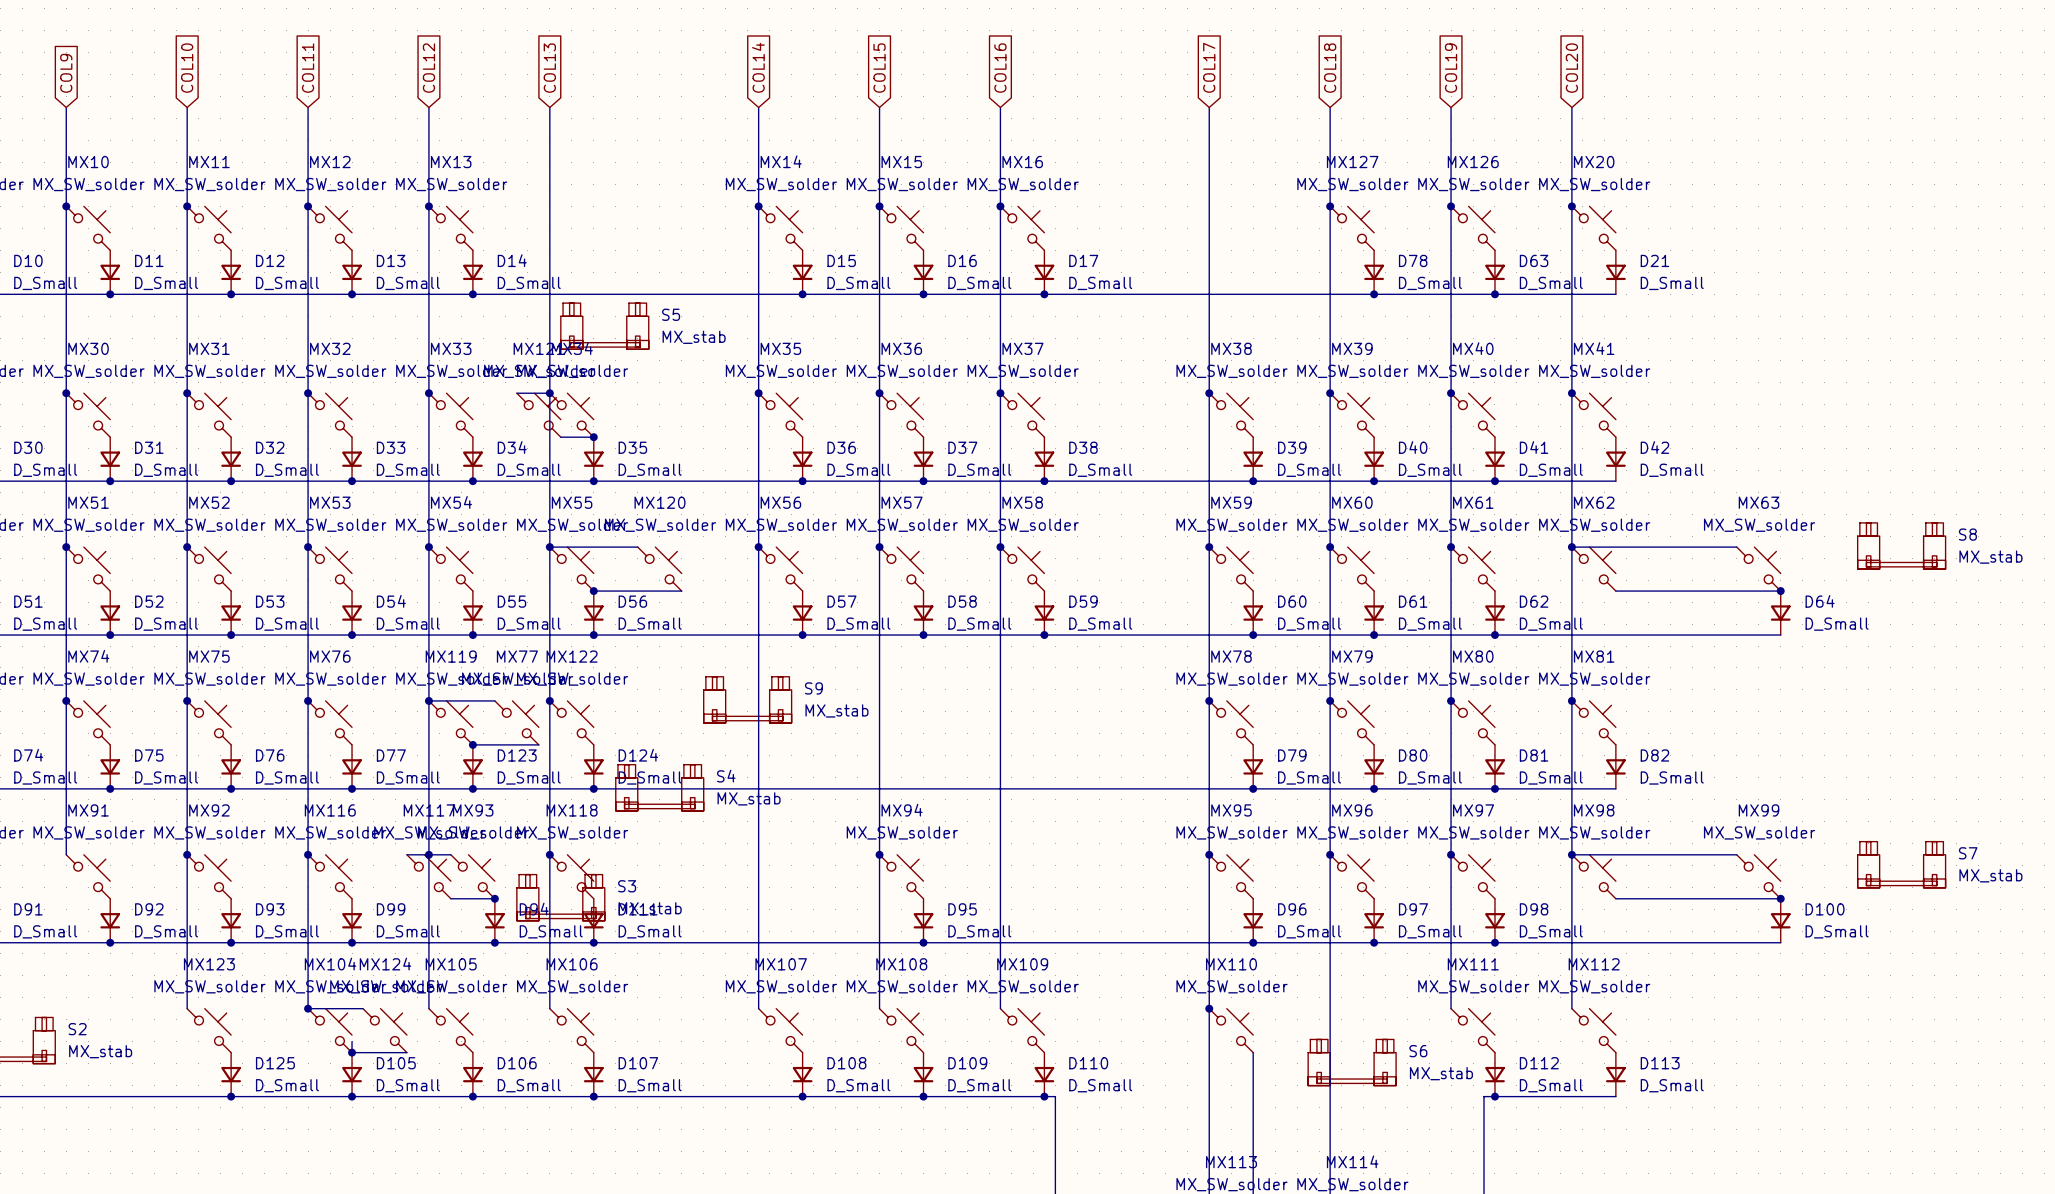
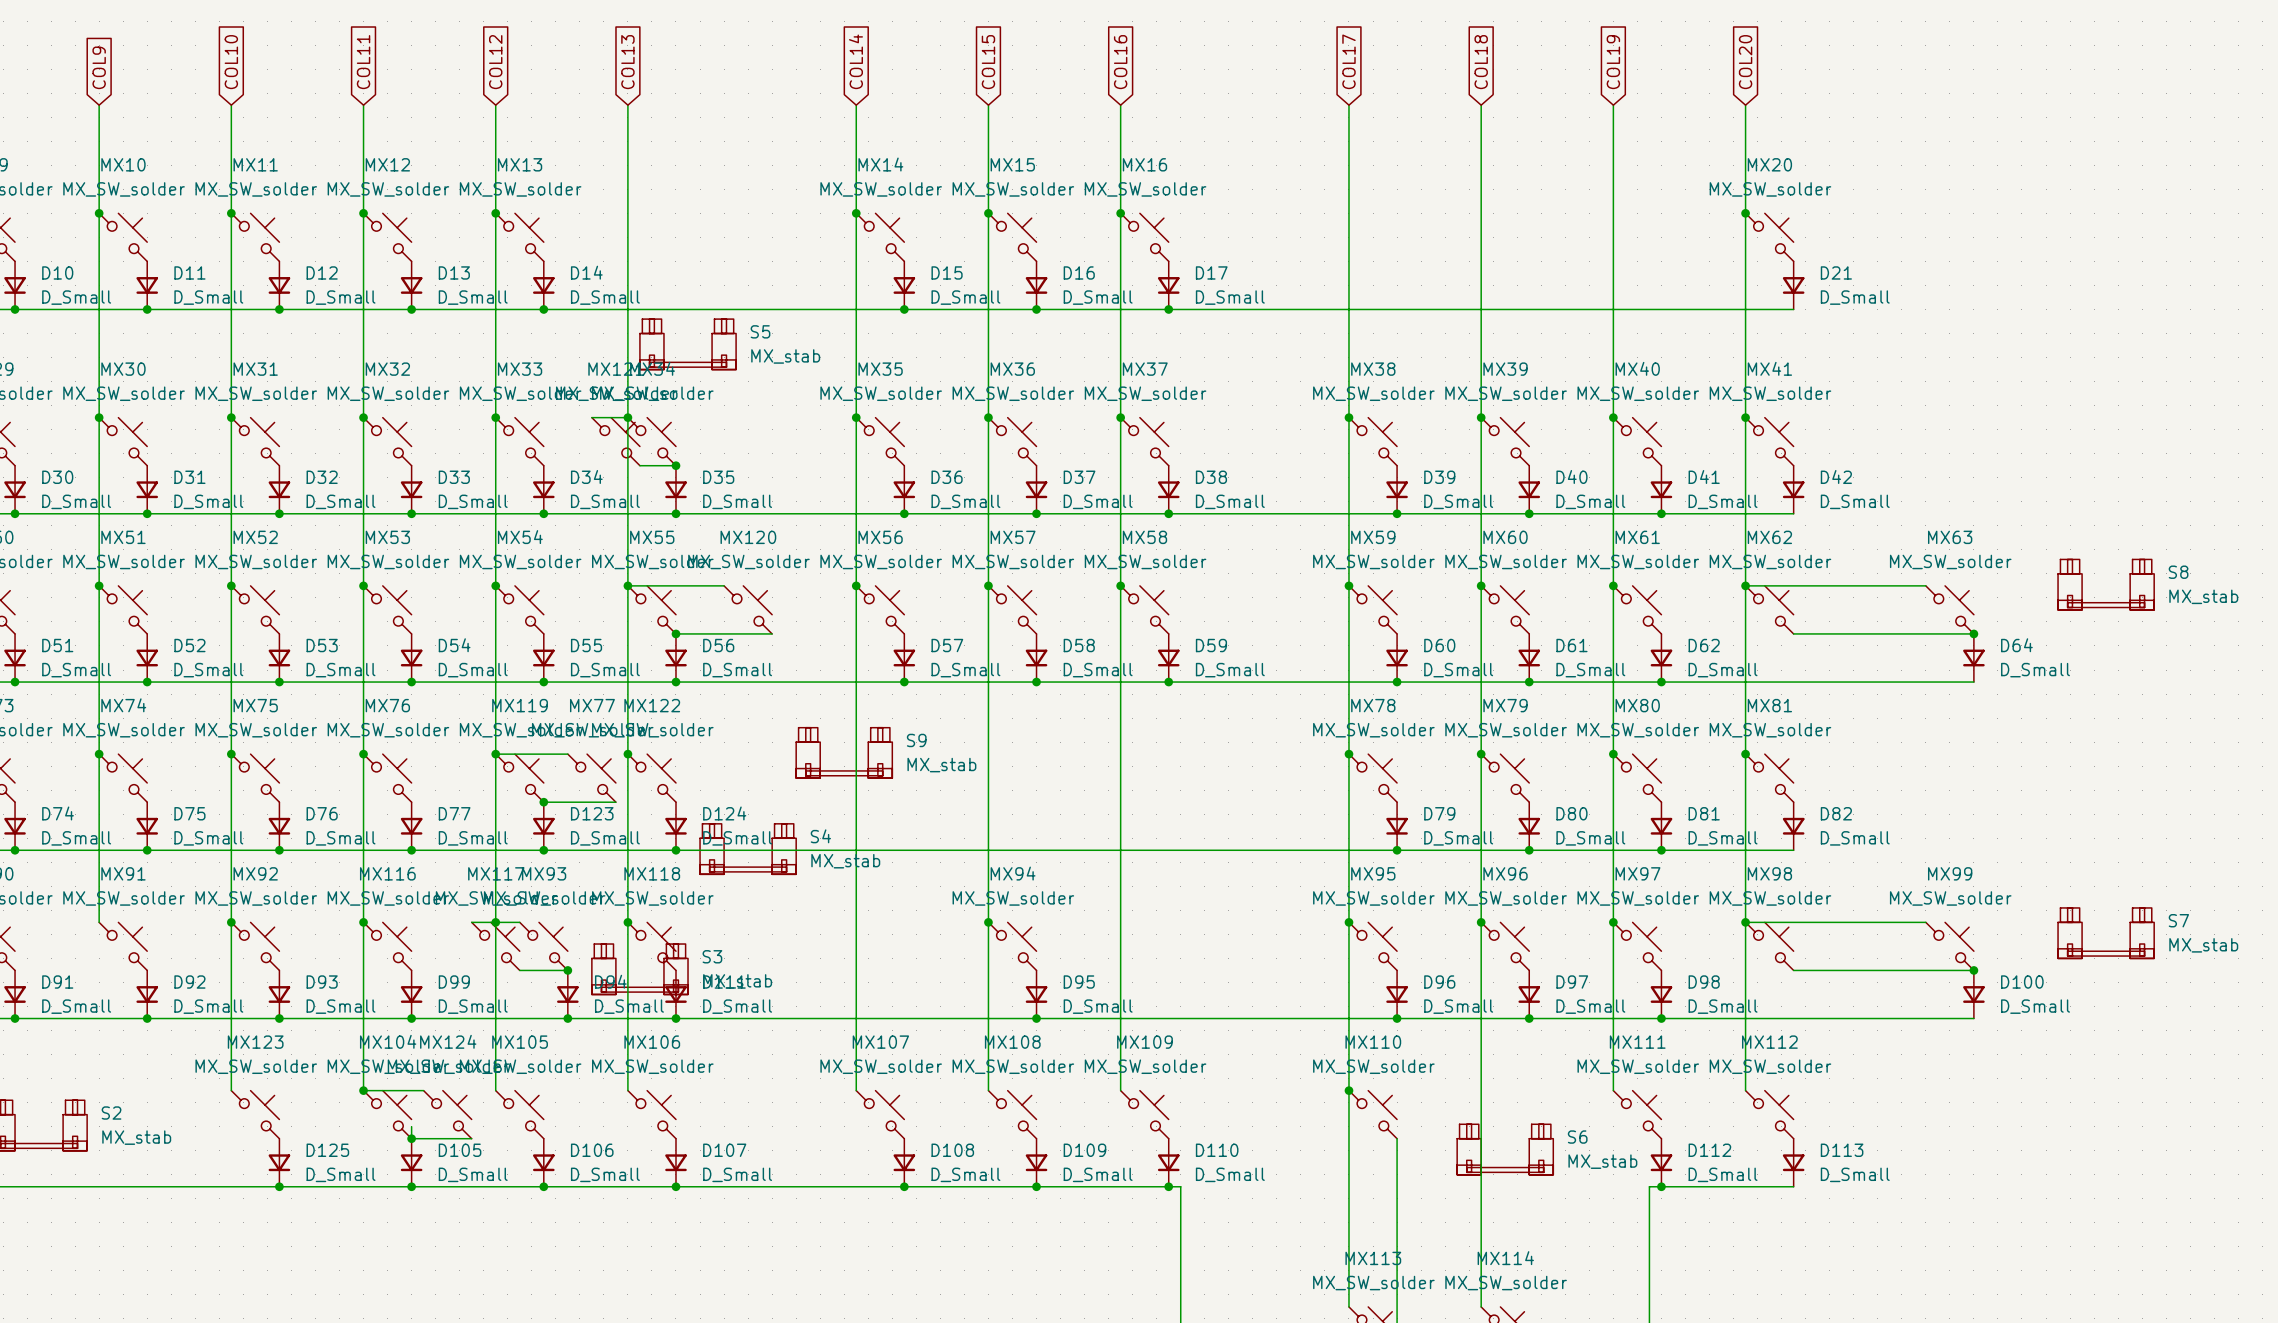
junction: (1330, 206) -> none
junction: (1451, 206) -> none
MX127: MX_SW_solder (1352, 228) -> none
MX126: MX_SW_solder (1473, 228) -> none
D78: D_Small (1374, 272) -> none
D63: D_Small (1494, 272) -> none
junction: (1374, 294) -> none
junction: (1494, 294) -> none

